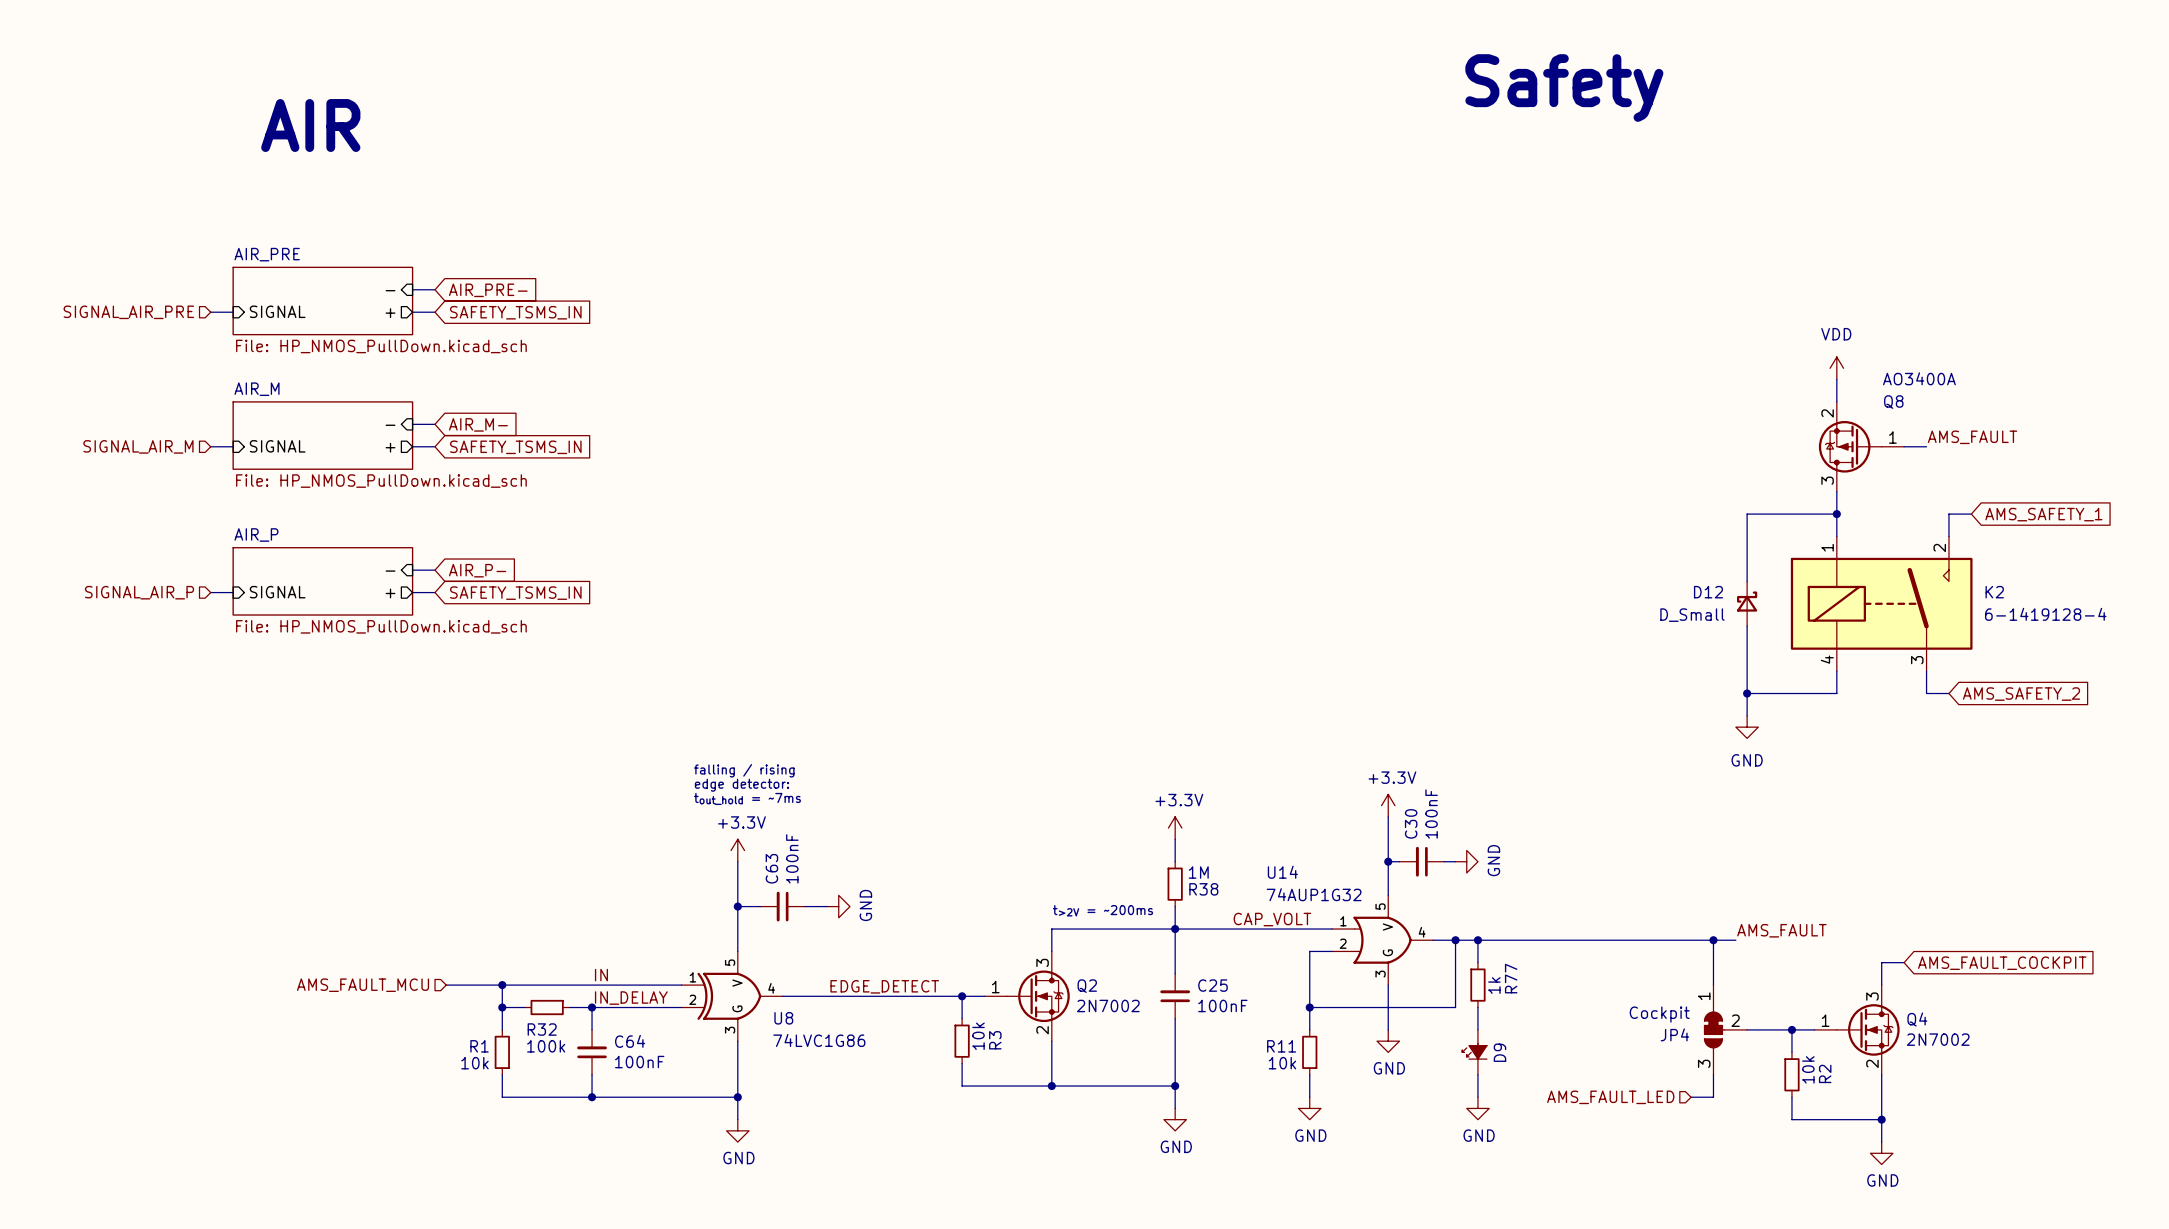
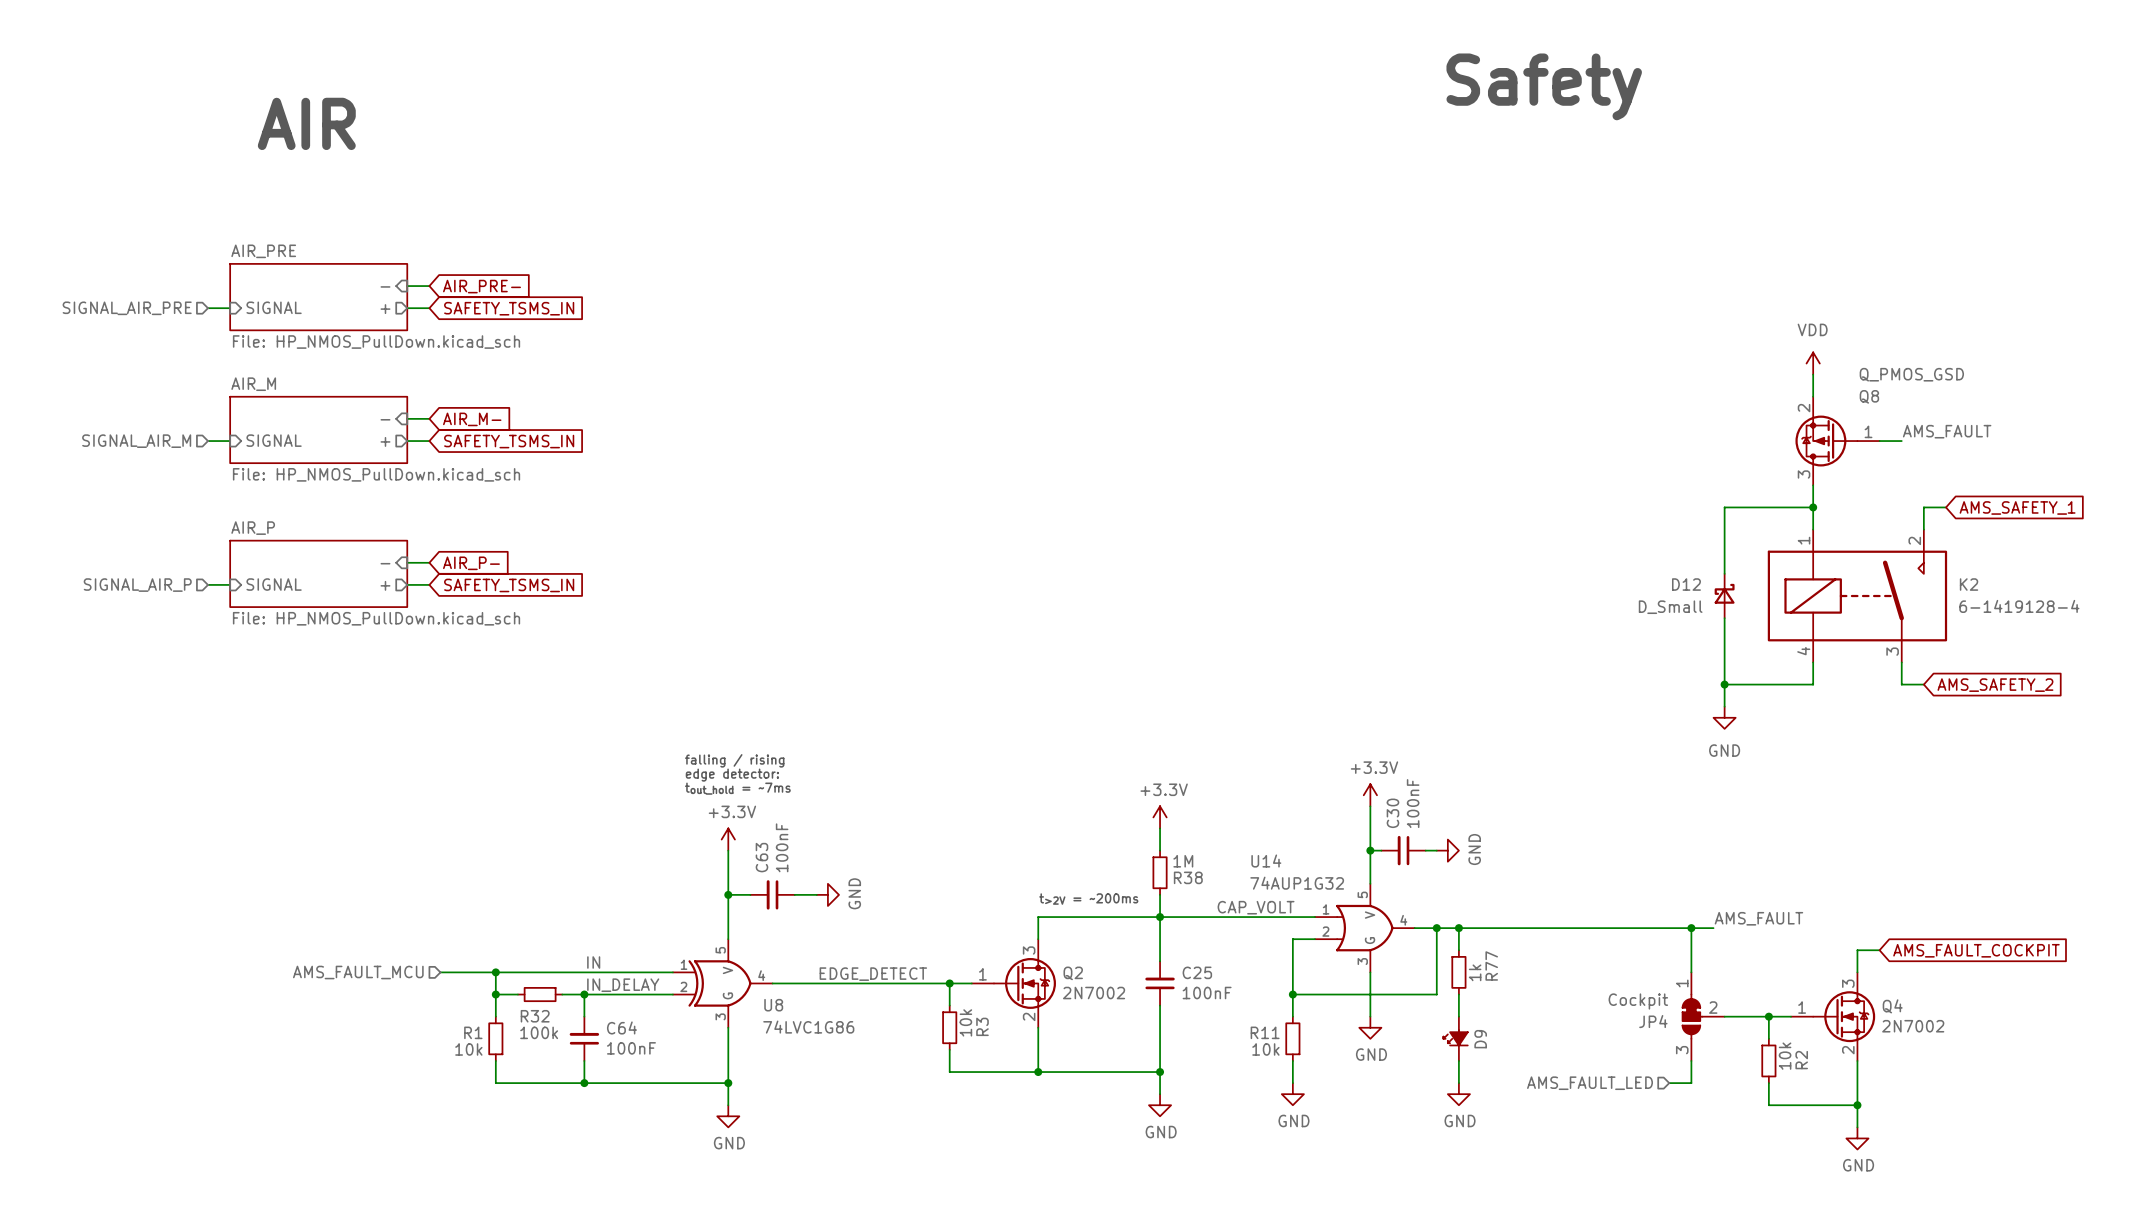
Q8 value: AO3400A (1919, 378) -> Q_PMOS_GSD (1911, 374)

